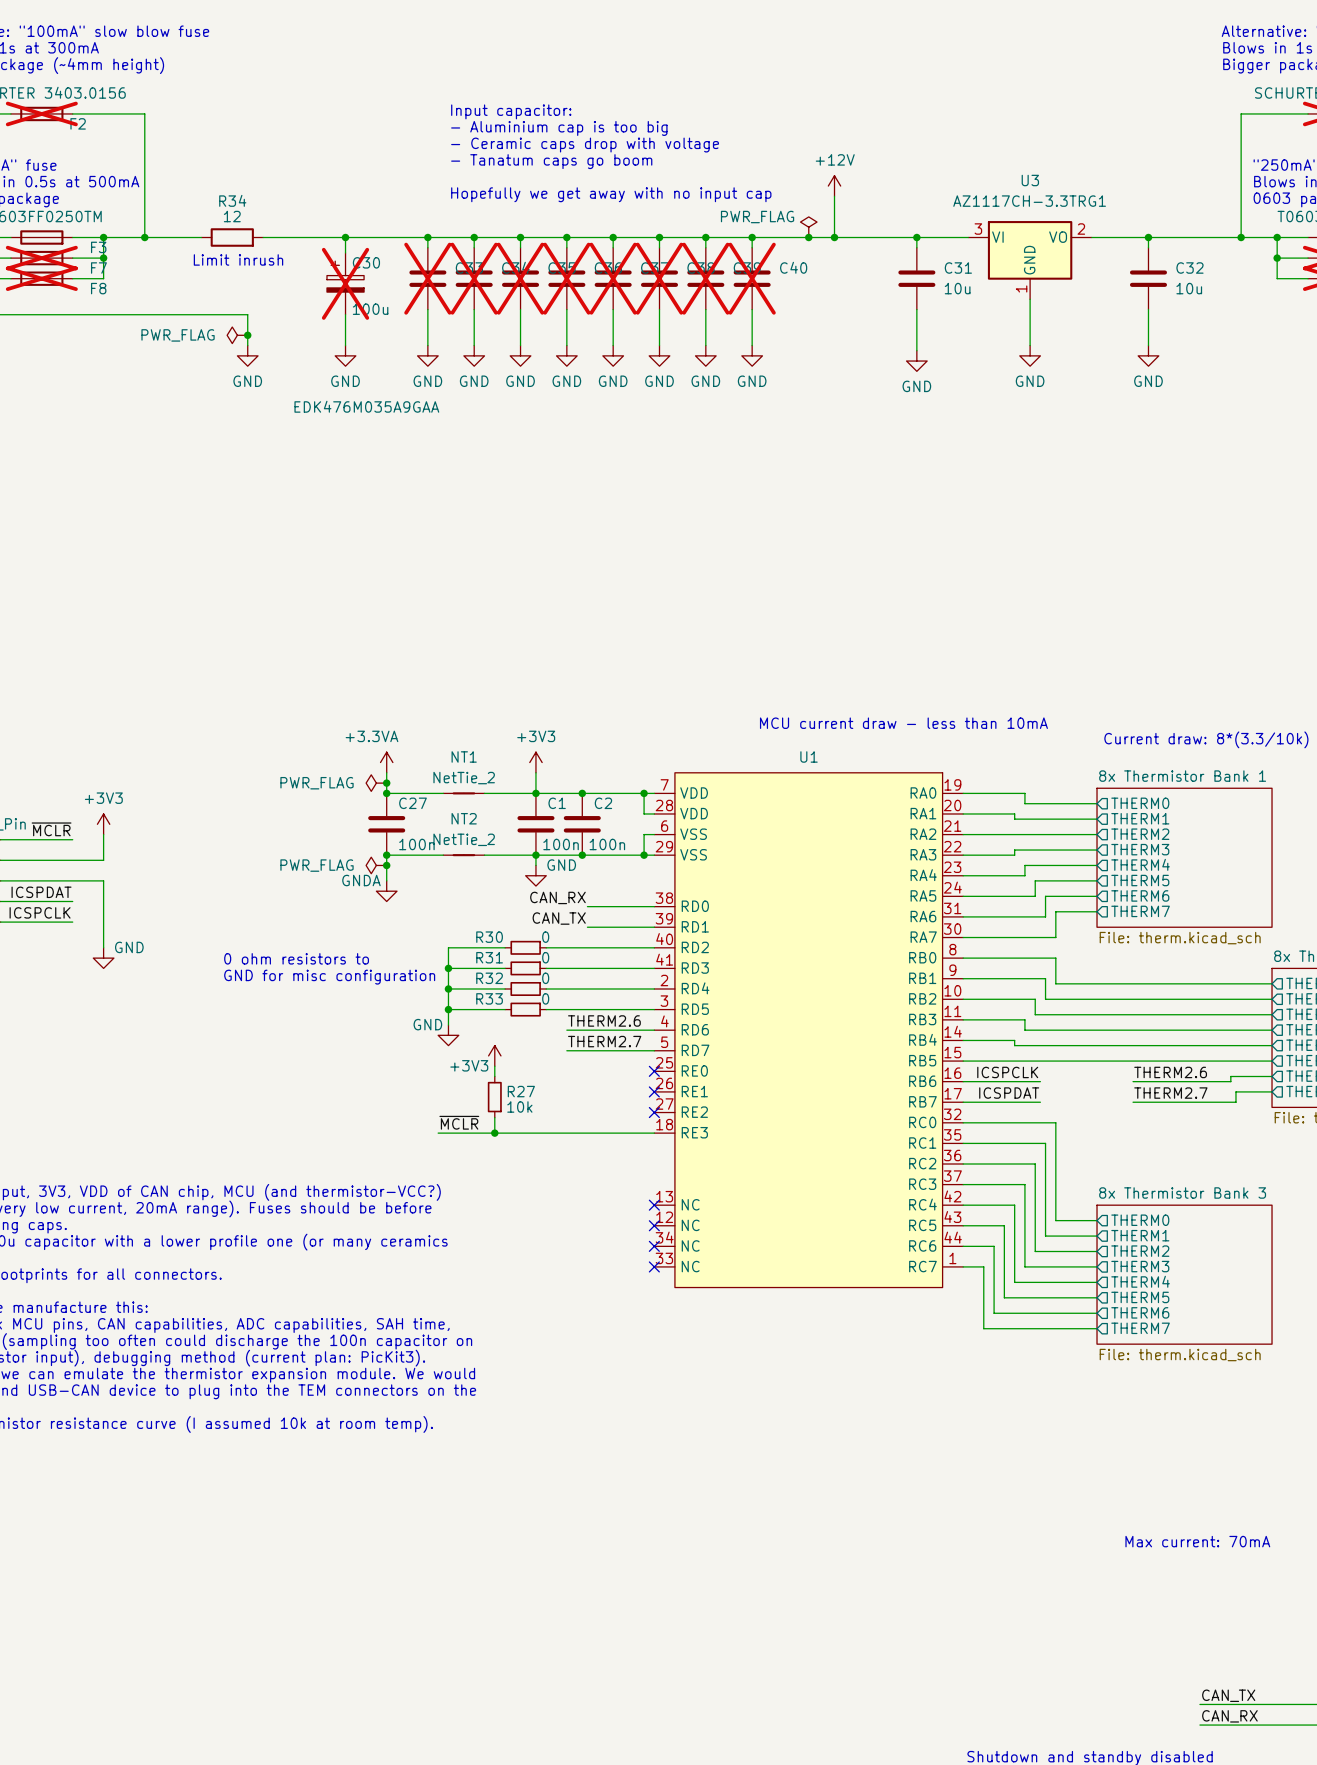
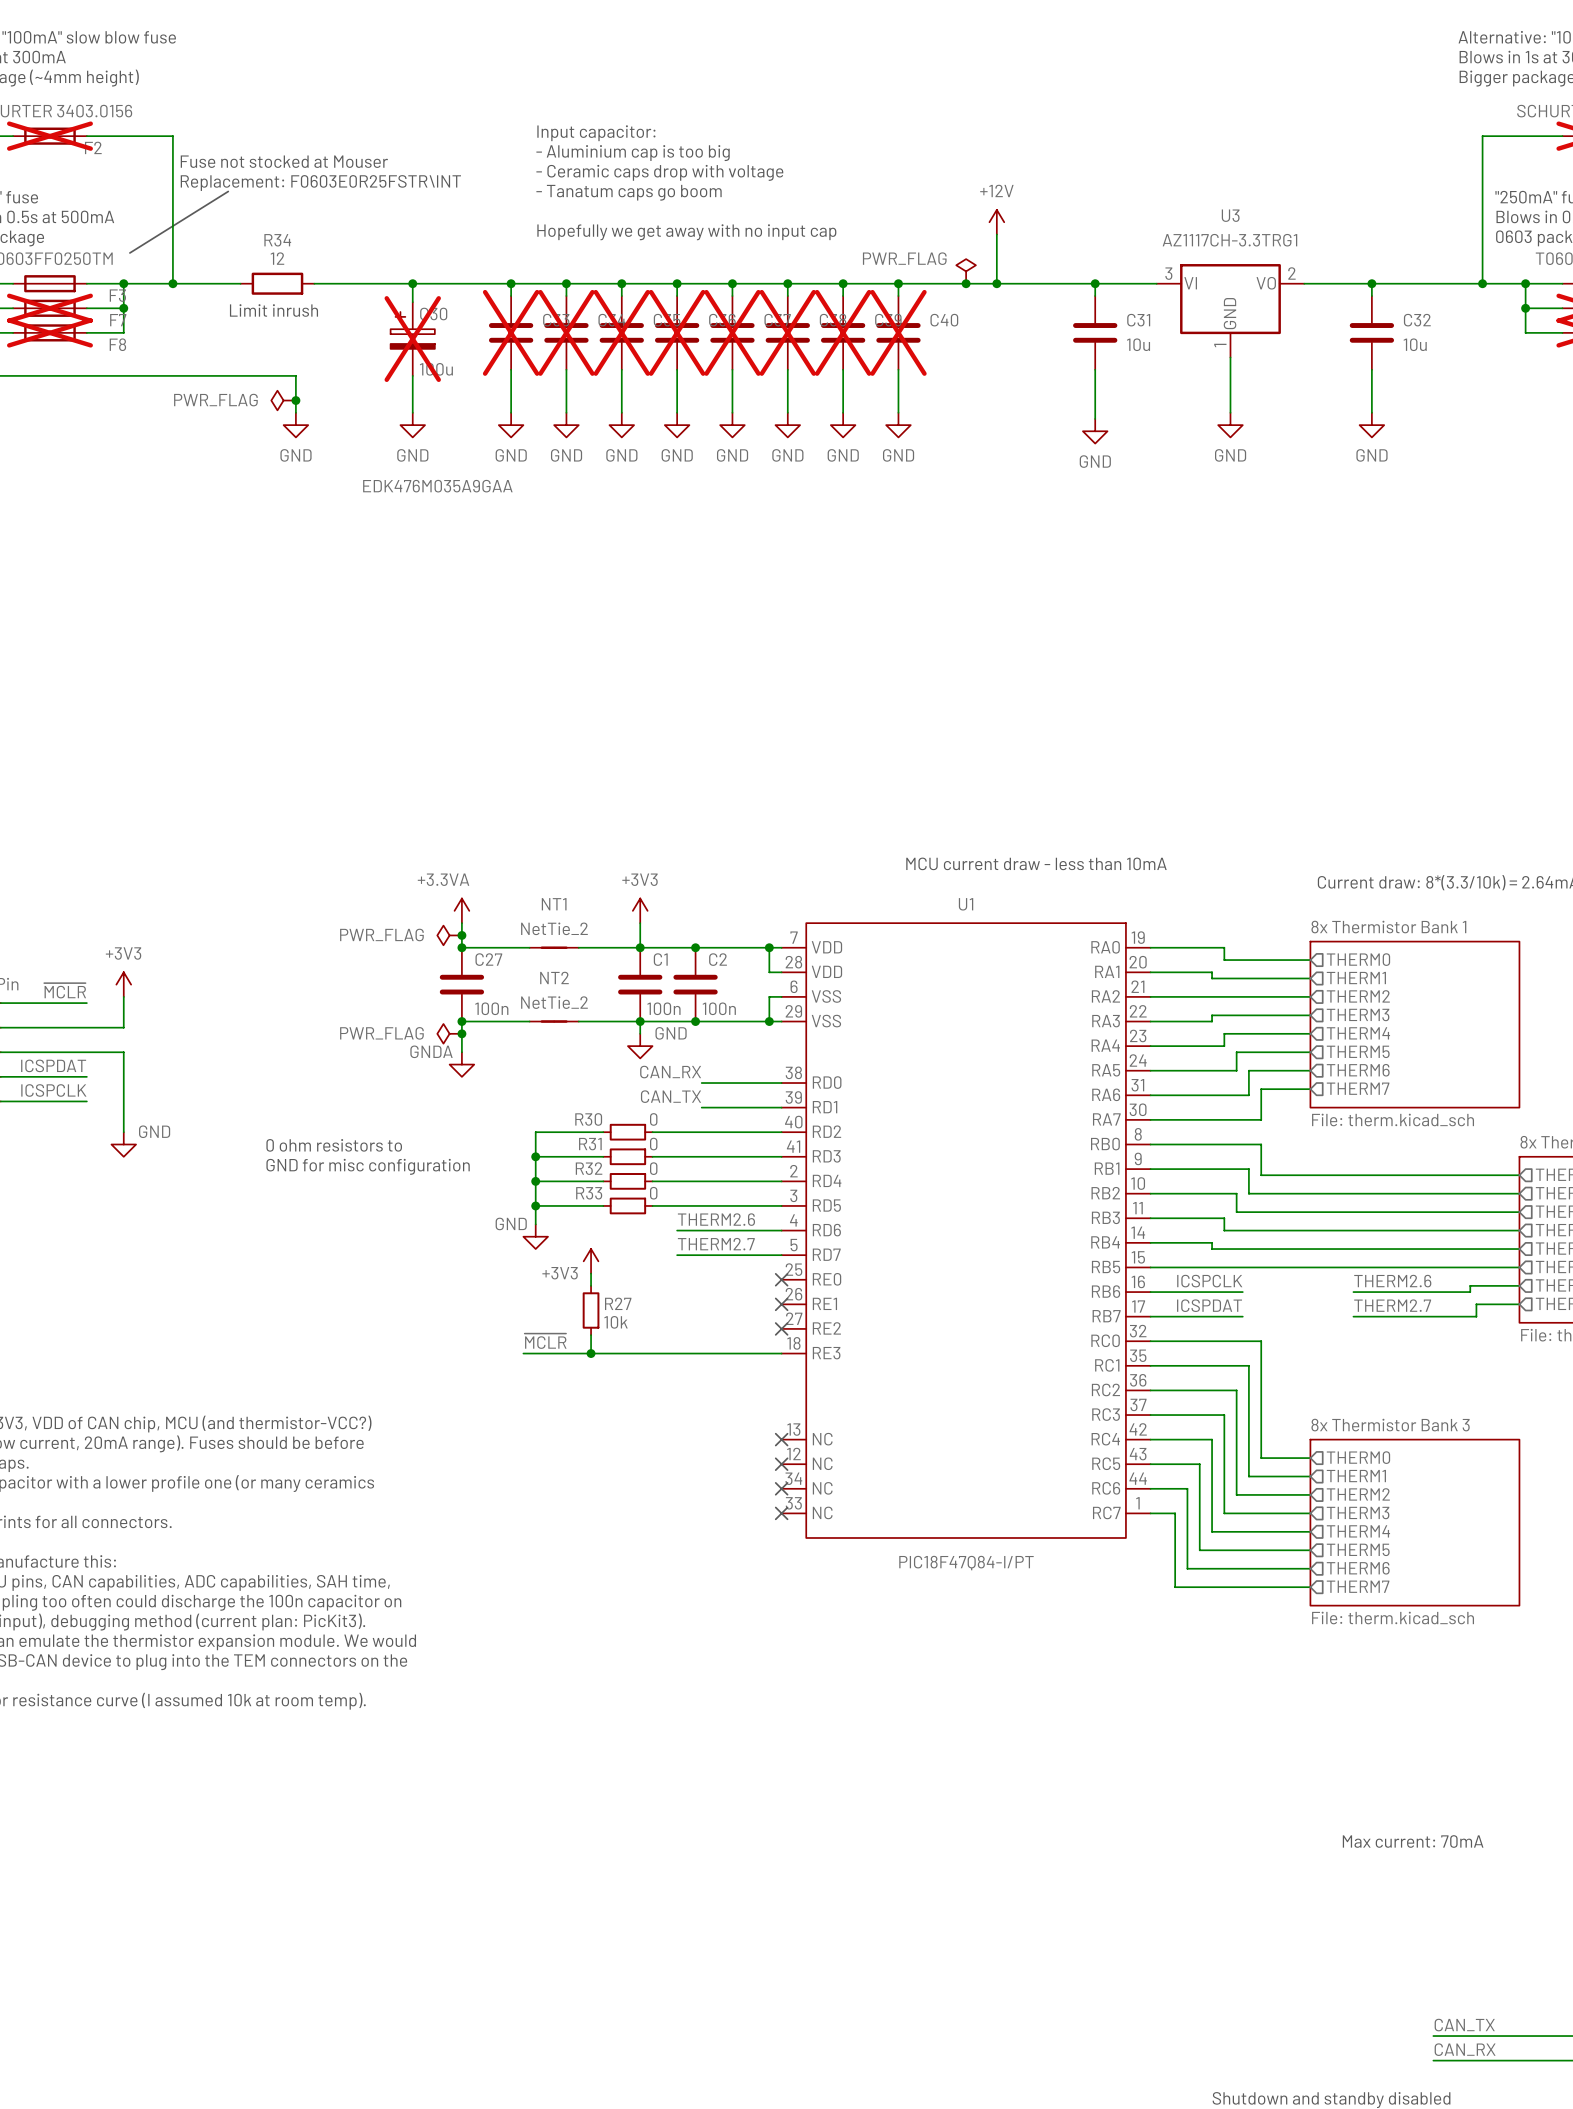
text: none -> Fuse not stocked at Mouser (284, 161)
text: none -> Replacement: F0603E0R25FSTR\INT (320, 183)
line: none -> (228, 191) (129, 252)
U1 value: none -> PIC18F47Q84-I/PT (966, 1563)

